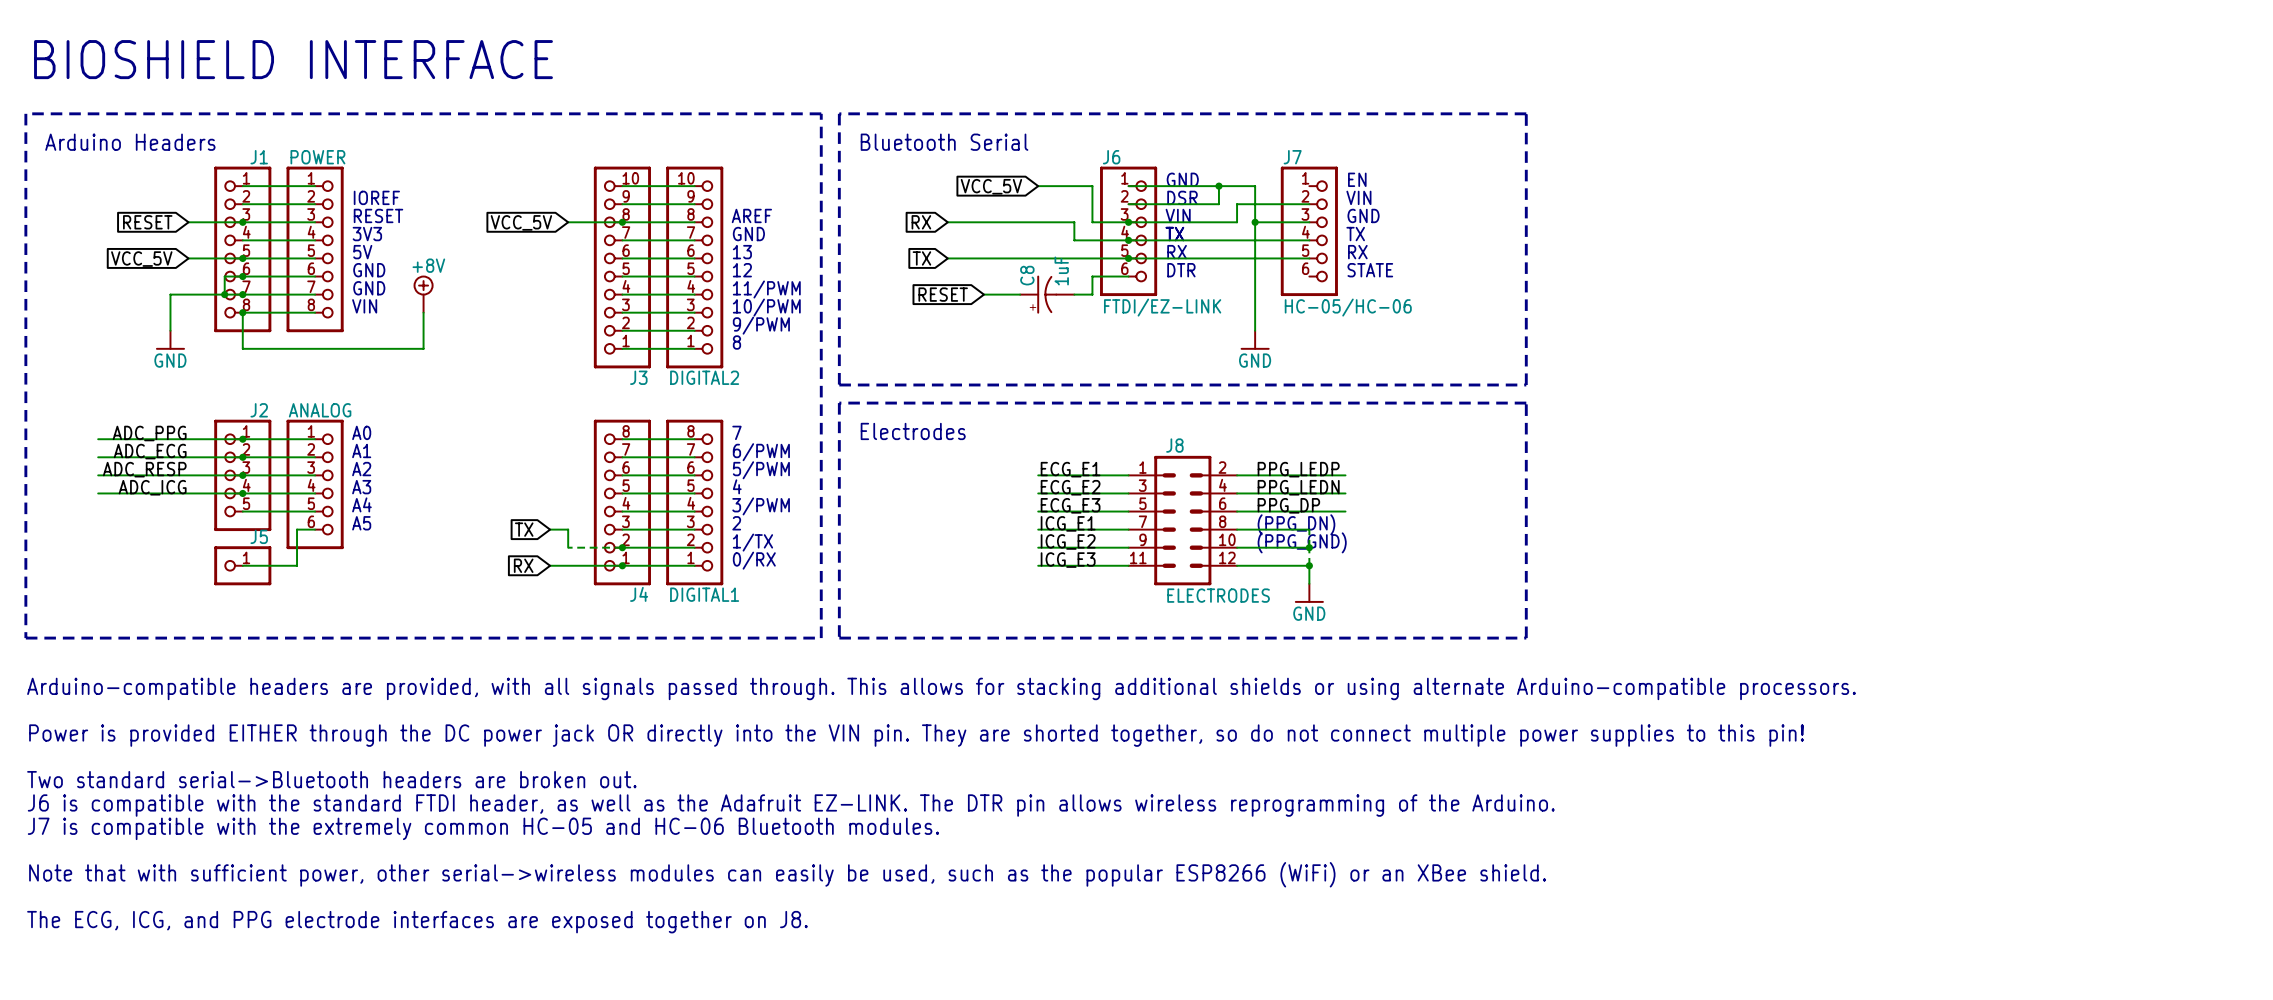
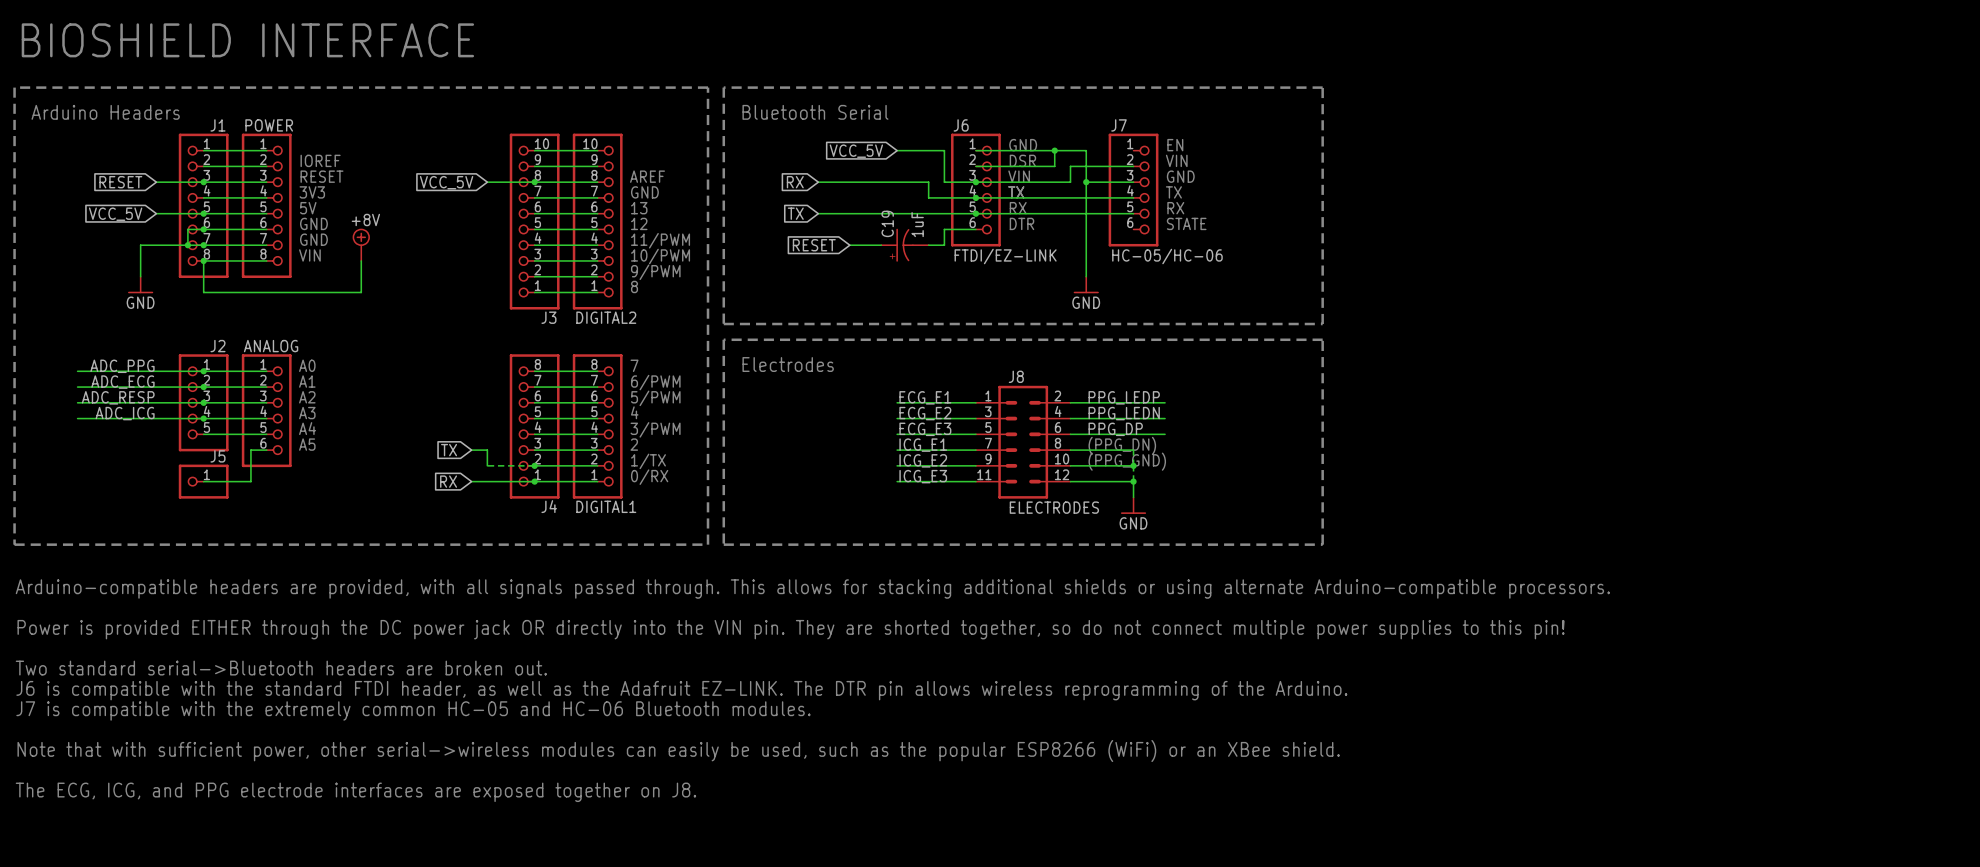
C8 name: C8 (1027, 275) -> C19 (887, 223)

